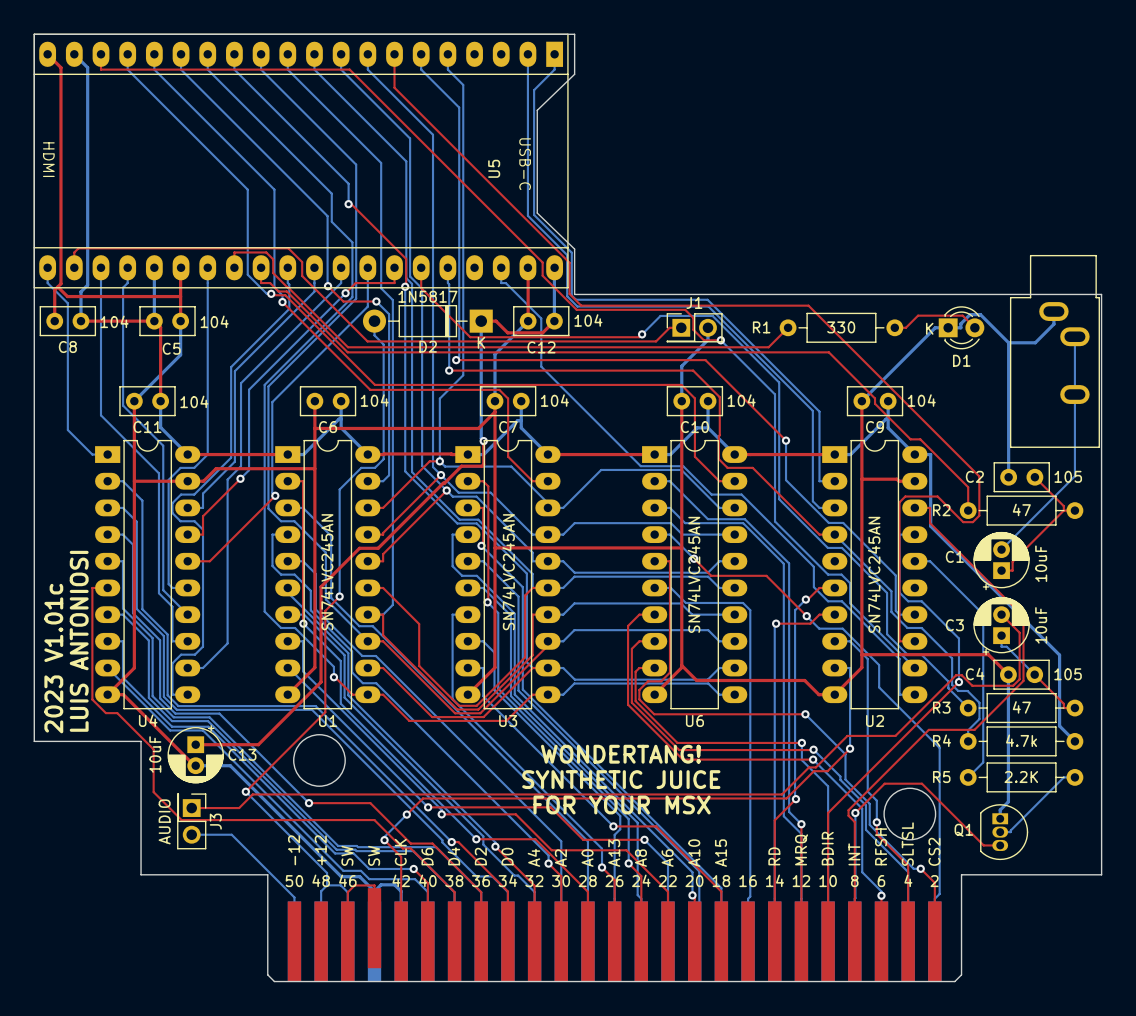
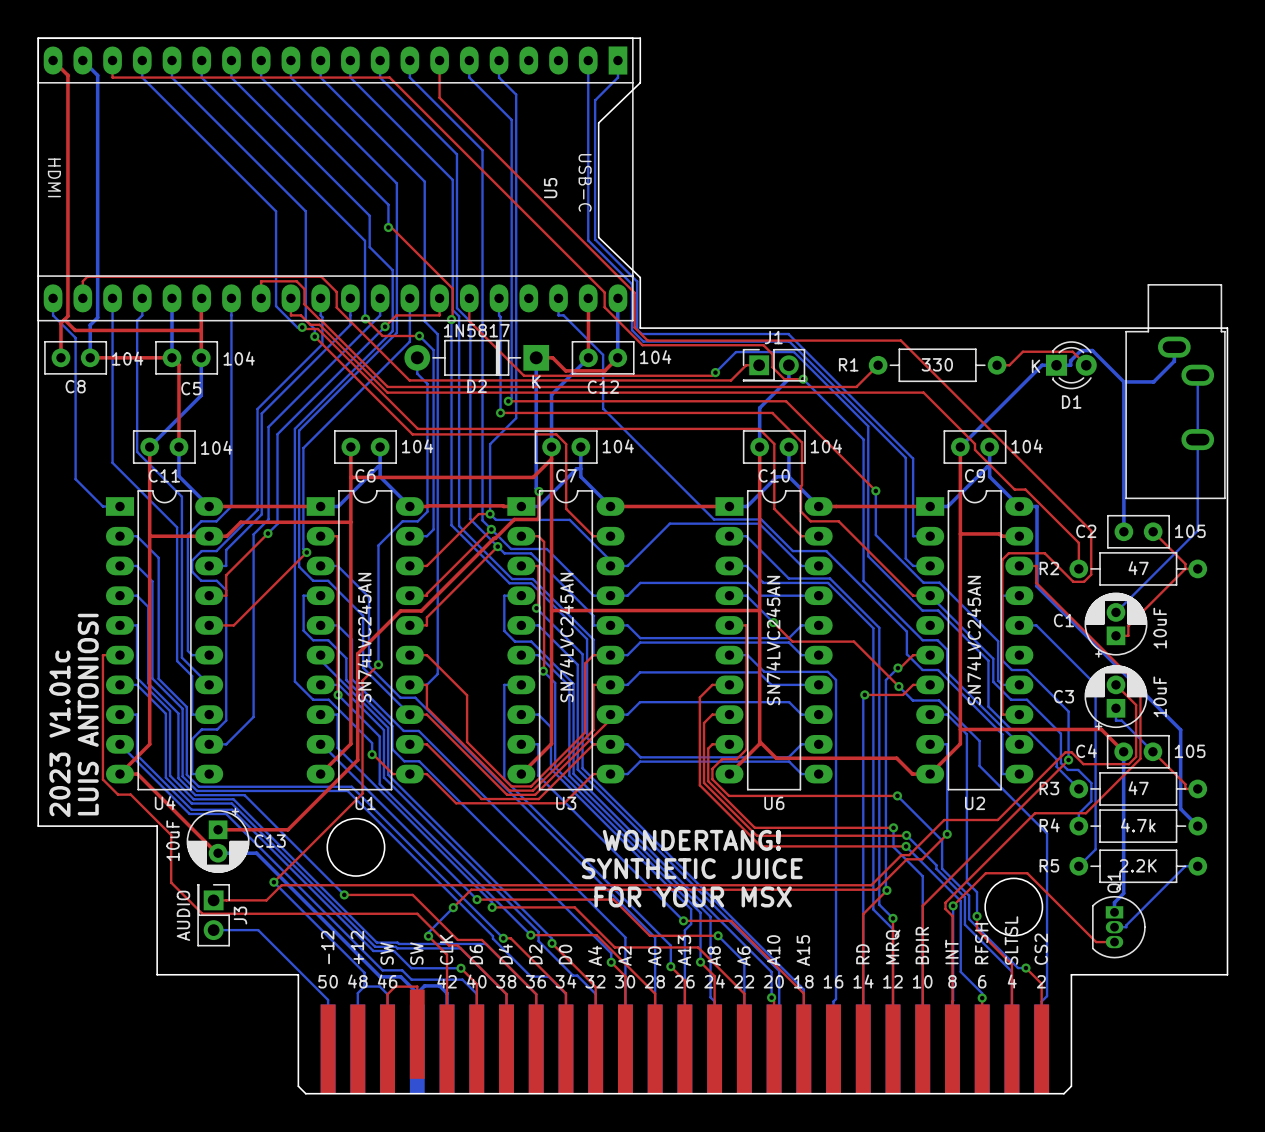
Q1 name rotation: 0° (963, 830) -> 90° counterclockwise (1114, 882)
Q1 name position: Q1 (963, 830) -> Q1 (1114, 882)

